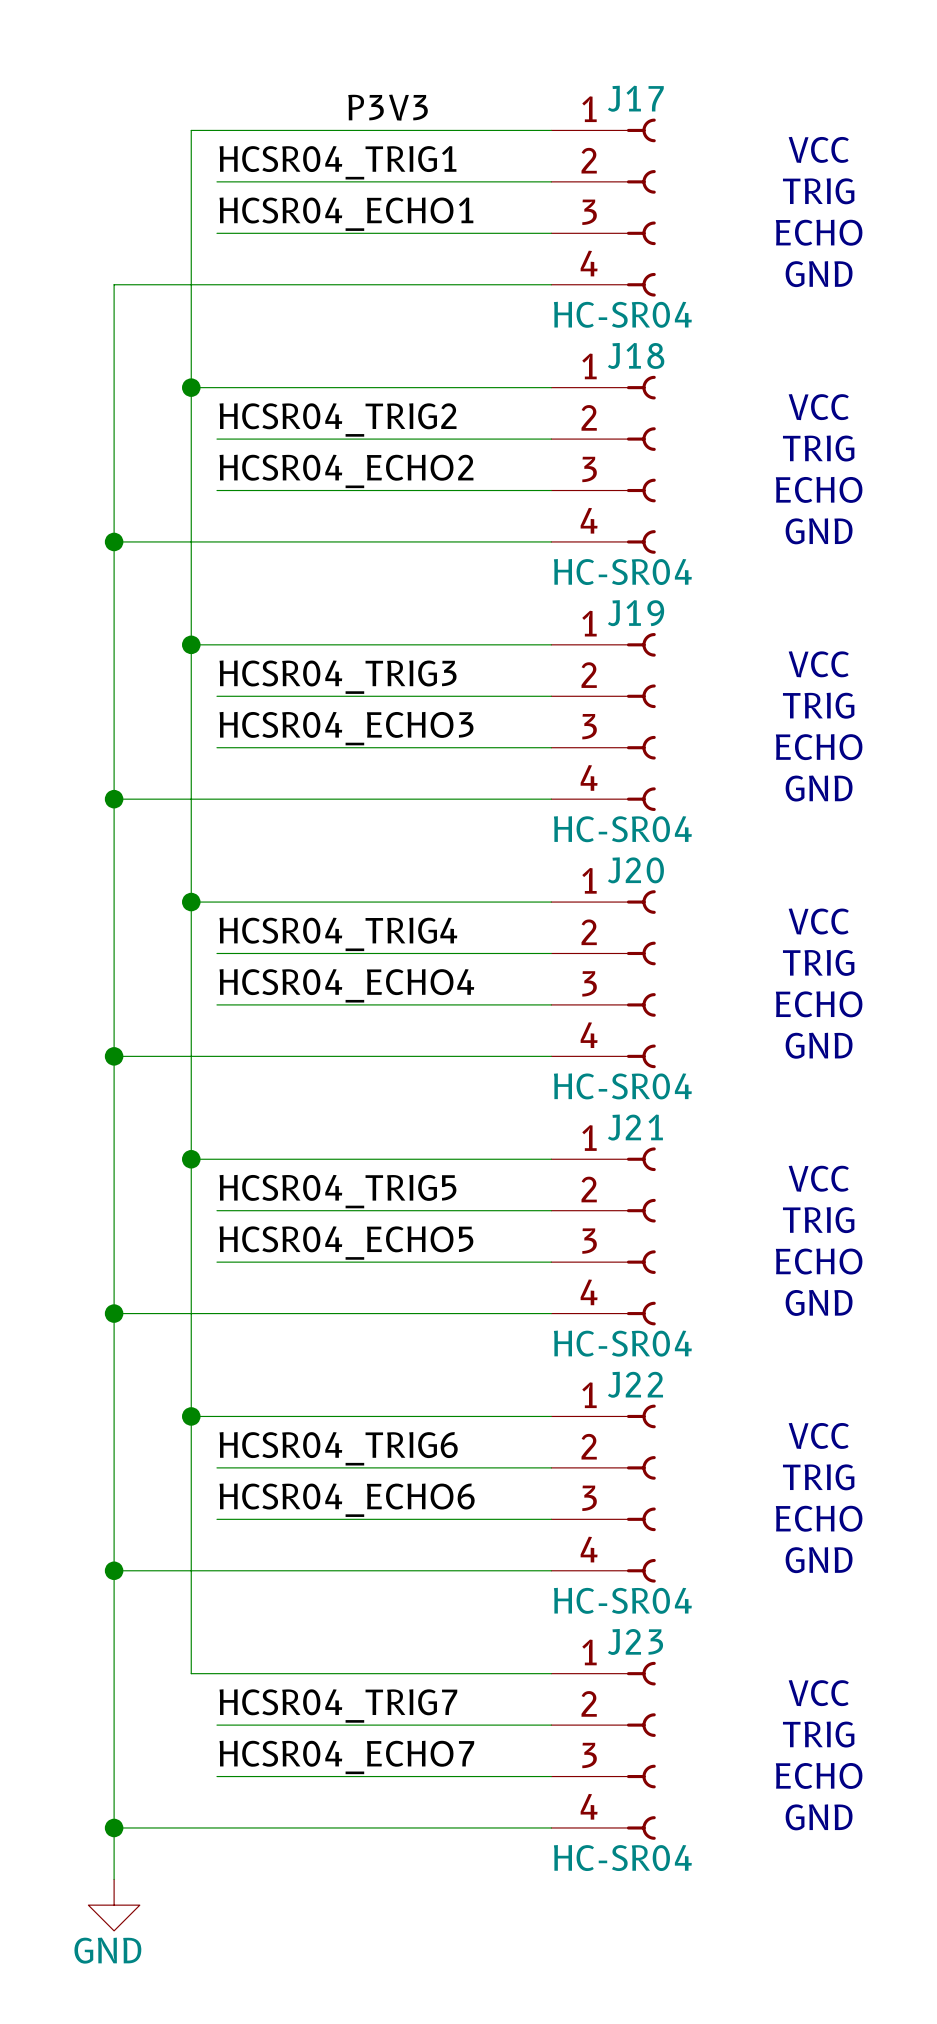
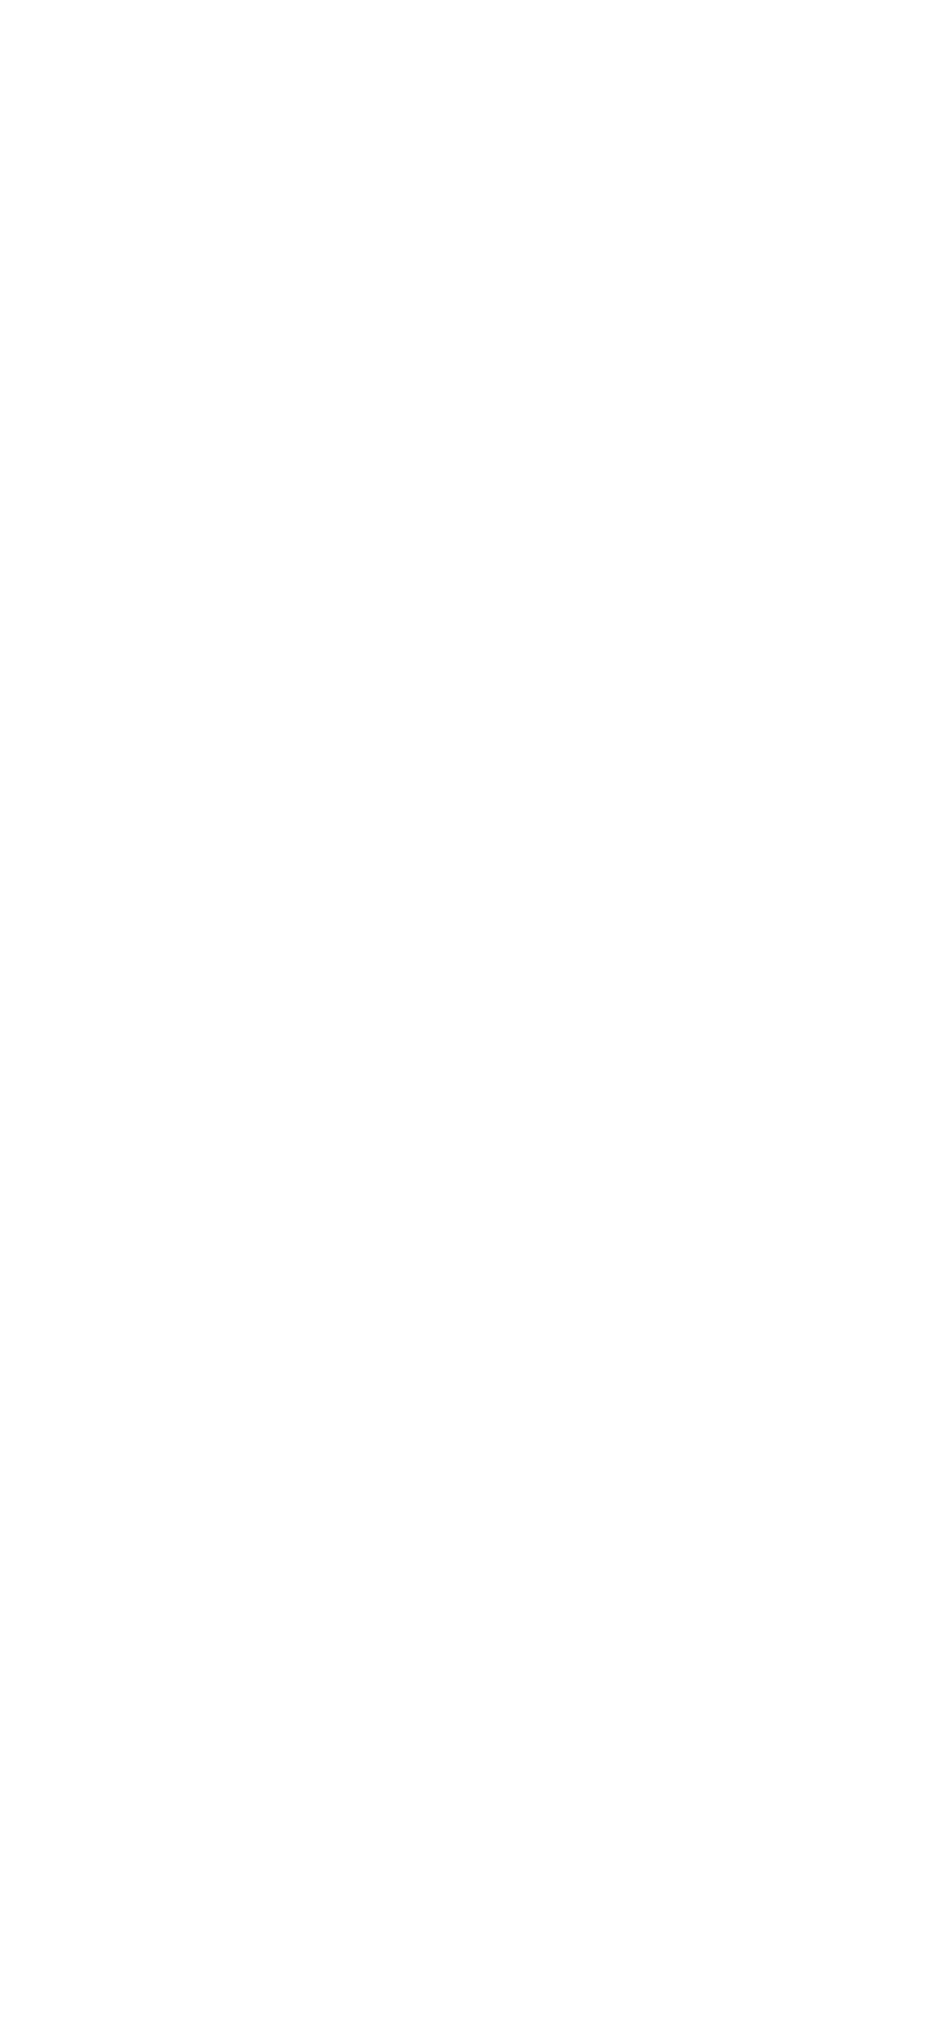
label: P3V3 (388, 107) -> none
wire: (551, 130) (191, 130) (191, 1673) (551, 1673) -> none
text: VCC (818, 149) -> none
label: HCSR04_TRIG1 (337, 162) -> none
wire: (216, 181) (551, 181) -> none
text: TRIG (818, 191) -> none
J17: HC-SR04 (603, 207) -> none
label: HCSR04_ECHO1 (346, 214) -> none
text: ECHO (819, 232) -> none
wire: (216, 233) (551, 233) -> none
text: GND (819, 274) -> none
wire: (551, 284) (114, 284) (114, 1879) -> none
wire: (191, 387) (551, 387) -> none
junction: (191, 387) -> none
text: VCC (818, 407) -> none
label: HCSR04_TRIG2 (338, 419) -> none
wire: (216, 439) (551, 439) -> none
text: TRIG (818, 448) -> none
J18: HC-SR04 (603, 464) -> none
label: HCSR04_ECHO2 (346, 471) -> none
text: ECHO (819, 489) -> none
wire: (216, 490) (551, 490) -> none
text: GND (819, 531) -> none
wire: (114, 541) (551, 541) -> none
junction: (114, 541) -> none
wire: (191, 644) (551, 644) -> none
junction: (191, 644) -> none
text: VCC (818, 664) -> none
label: HCSR04_TRIG3 (338, 677) -> none
wire: (216, 696) (551, 696) -> none
text: TRIG (818, 705) -> none
J19: HC-SR04 (603, 722) -> none
label: HCSR04_ECHO3 (346, 728) -> none
wire: (216, 747) (551, 747) -> none
text: ECHO (819, 747) -> none
text: GND (819, 788) -> none
wire: (114, 799) (551, 799) -> none
junction: (114, 799) -> none
wire: (191, 902) (551, 902) -> none
junction: (191, 902) -> none
text: VCC (818, 921) -> none
label: HCSR04_TRIG4 (338, 934) -> none
wire: (216, 953) (551, 953) -> none
text: TRIG (818, 962) -> none
J20: HC-SR04 (603, 979) -> none
label: HCSR04_ECHO4 (346, 985) -> none
wire: (216, 1004) (551, 1004) -> none
text: ECHO (819, 1004) -> none
text: GND (819, 1045) -> none
wire: (114, 1056) (551, 1056) -> none
junction: (114, 1056) -> none
wire: (191, 1159) (551, 1159) -> none
junction: (191, 1159) -> none
text: VCC (818, 1178) -> none
label: HCSR04_TRIG5 (337, 1191) -> none
wire: (216, 1210) (551, 1210) -> none
text: TRIG (818, 1220) -> none
J21: HC-SR04 (603, 1236) -> none
label: HCSR04_ECHO5 (346, 1243) -> none
text: ECHO (819, 1261) -> none
wire: (216, 1262) (551, 1262) -> none
text: GND (819, 1302) -> none
wire: (114, 1313) (551, 1313) -> none
junction: (114, 1313) -> none
wire: (191, 1416) (551, 1416) -> none
junction: (191, 1416) -> none
text: VCC (818, 1435) -> none
label: HCSR04_TRIG6 (338, 1448) -> none
wire: (216, 1467) (551, 1467) -> none
text: TRIG (818, 1477) -> none
J22: HC-SR04 (603, 1493) -> none
label: HCSR04_ECHO6 (347, 1500) -> none
text: ECHO (819, 1518) -> none
wire: (216, 1519) (551, 1519) -> none
text: GND (819, 1560) -> none
wire: (114, 1570) (551, 1570) -> none
junction: (114, 1570) -> none
text: VCC (818, 1693) -> none
label: HCSR04_TRIG7 (338, 1706) -> none
wire: (216, 1725) (551, 1725) -> none
text: TRIG (818, 1734) -> none
J23: HC-SR04 (603, 1750) -> none
label: HCSR04_ECHO7 (346, 1757) -> none
text: ECHO (819, 1775) -> none
wire: (216, 1776) (551, 1776) -> none
text: GND (819, 1817) -> none
wire: (114, 1827) (551, 1827) -> none
junction: (114, 1827) -> none
power symbol: GND (114, 1905) -> none

